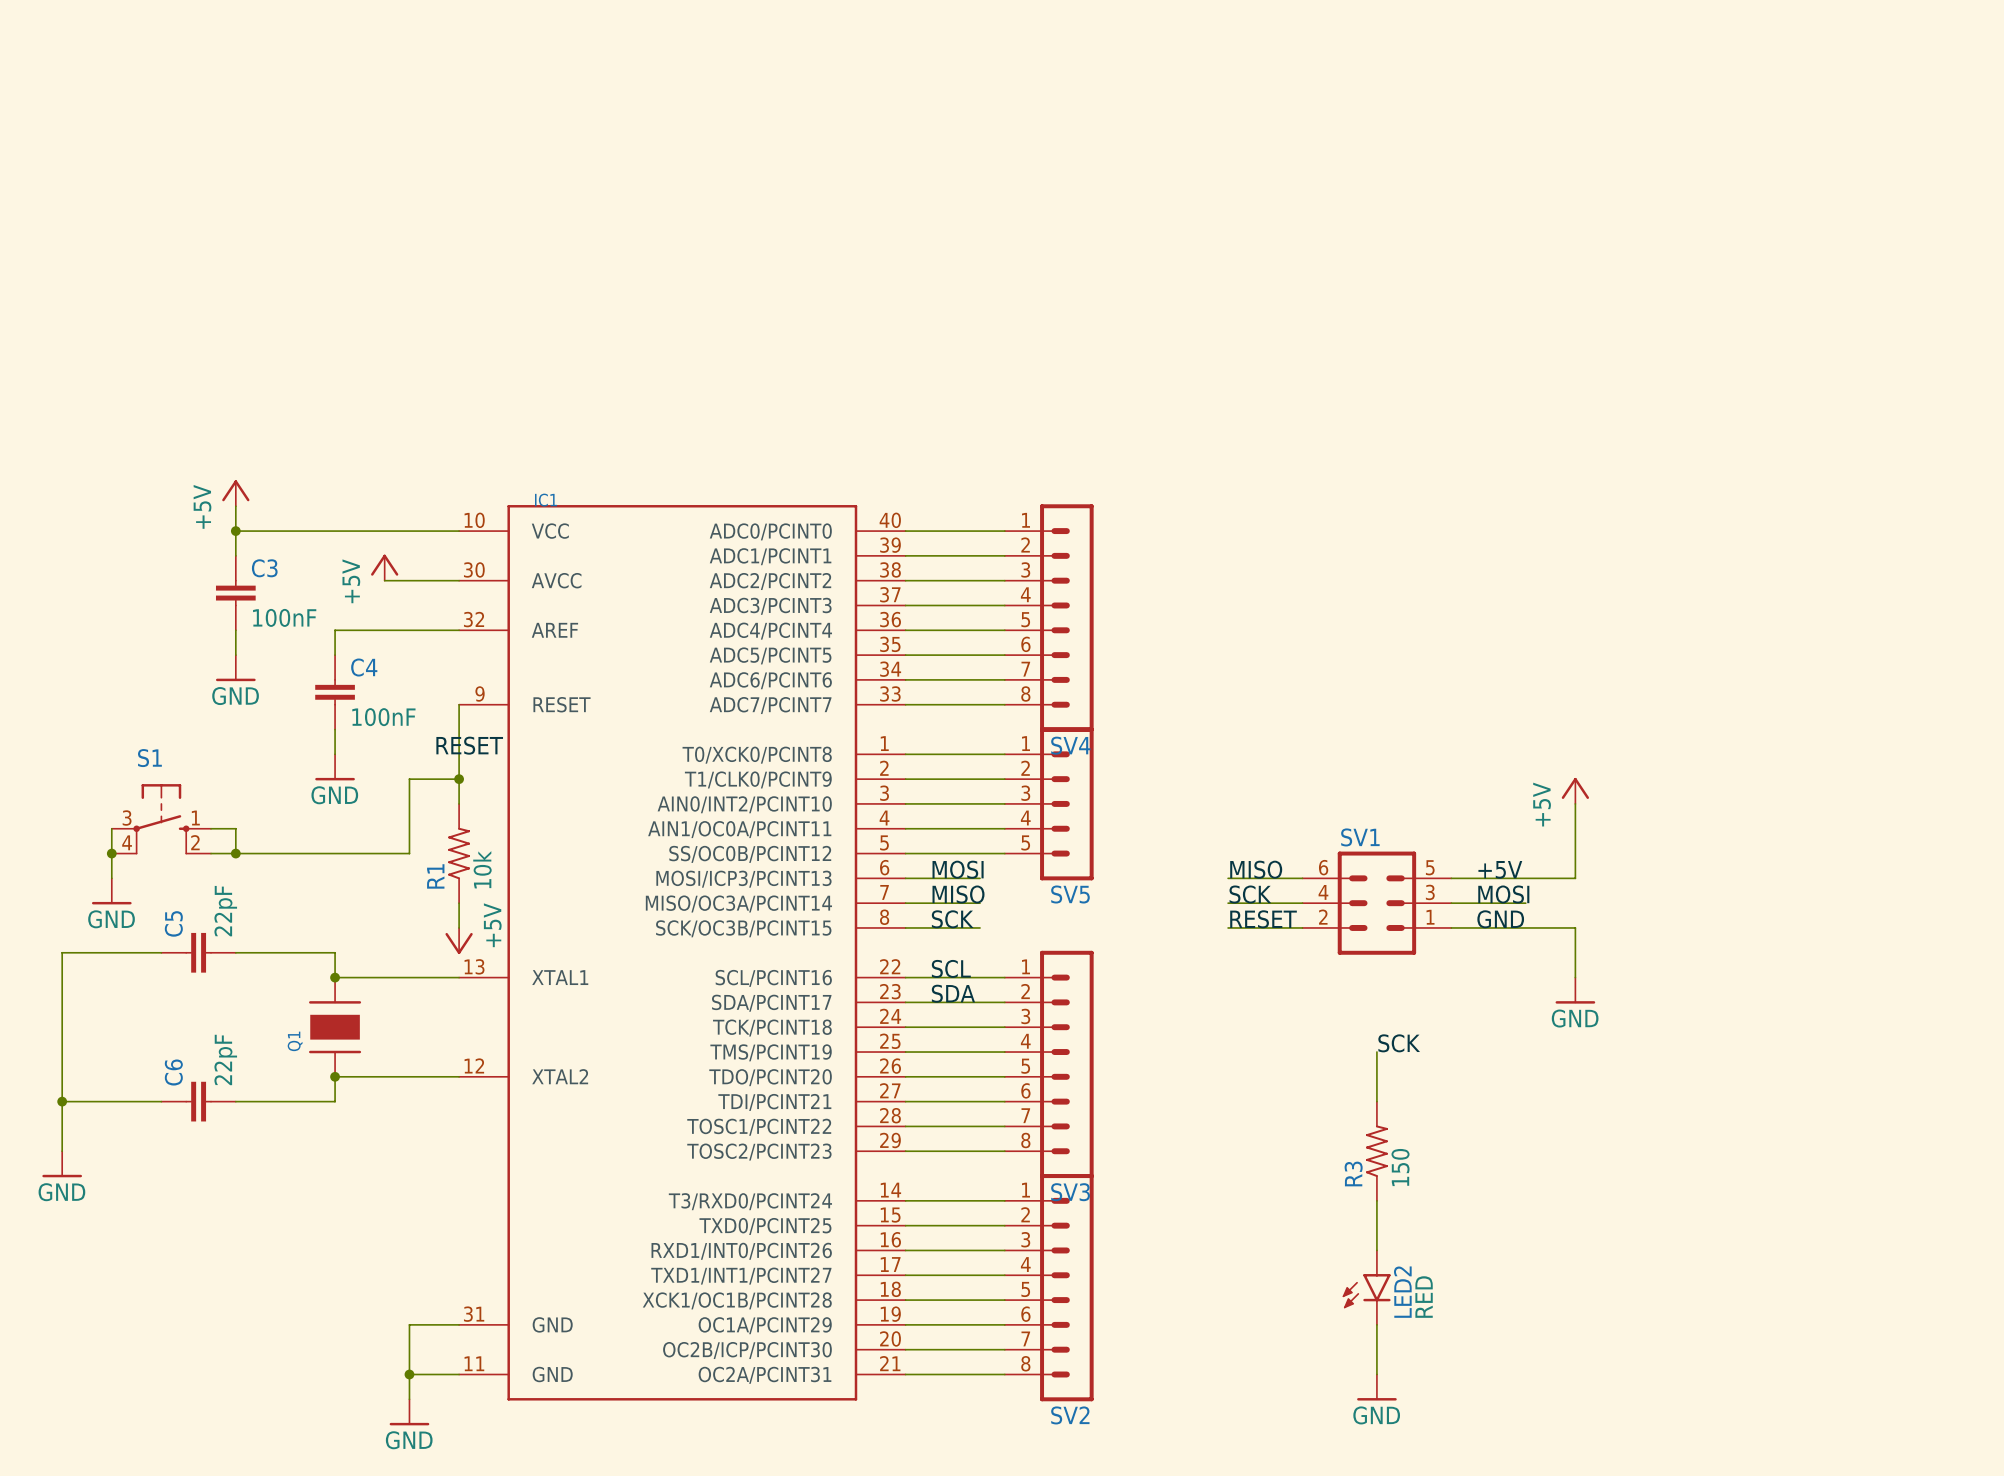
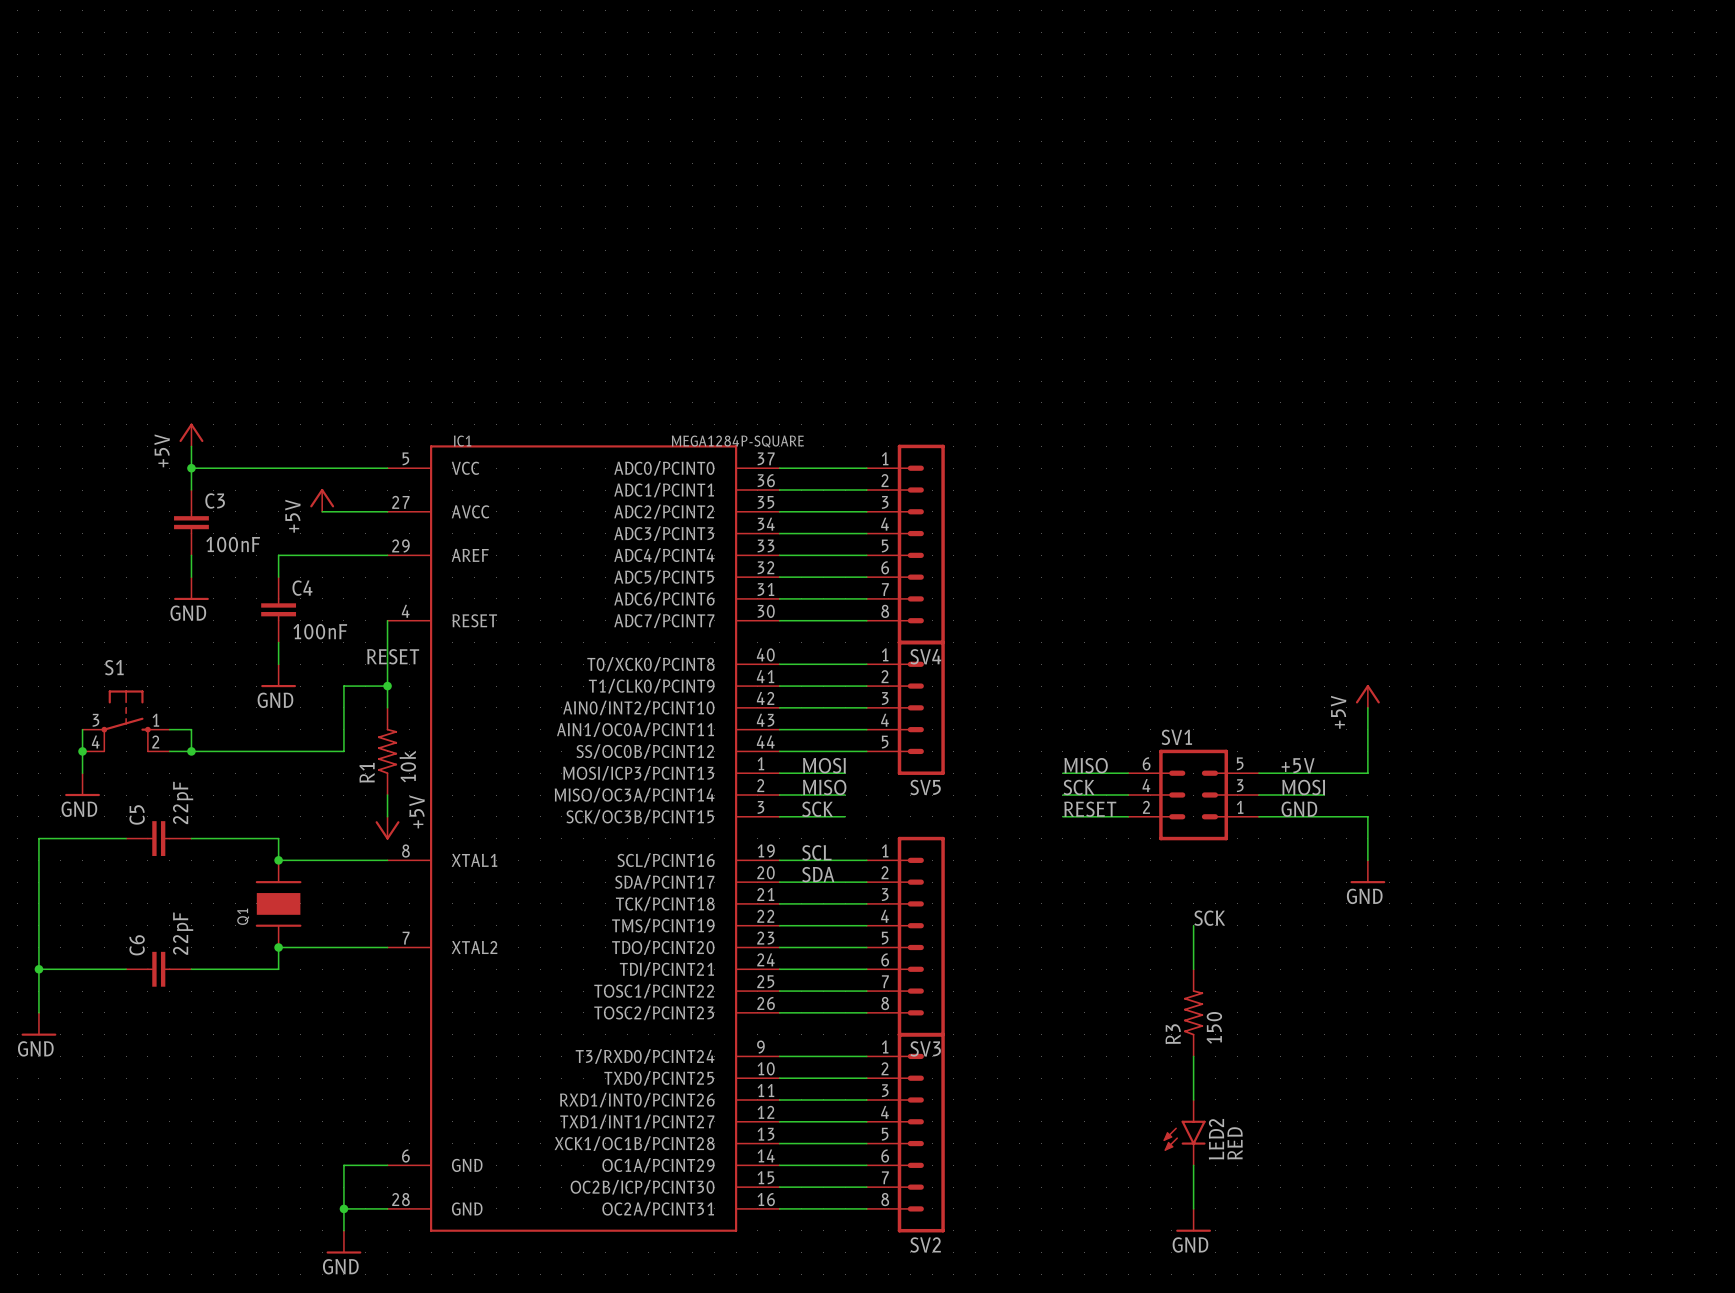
IC1 value: none -> MEGA1284P-SQUARE (737, 441)
IC1 symbol: [459, 505, 906, 1401] -> [387, 445, 780, 1232]

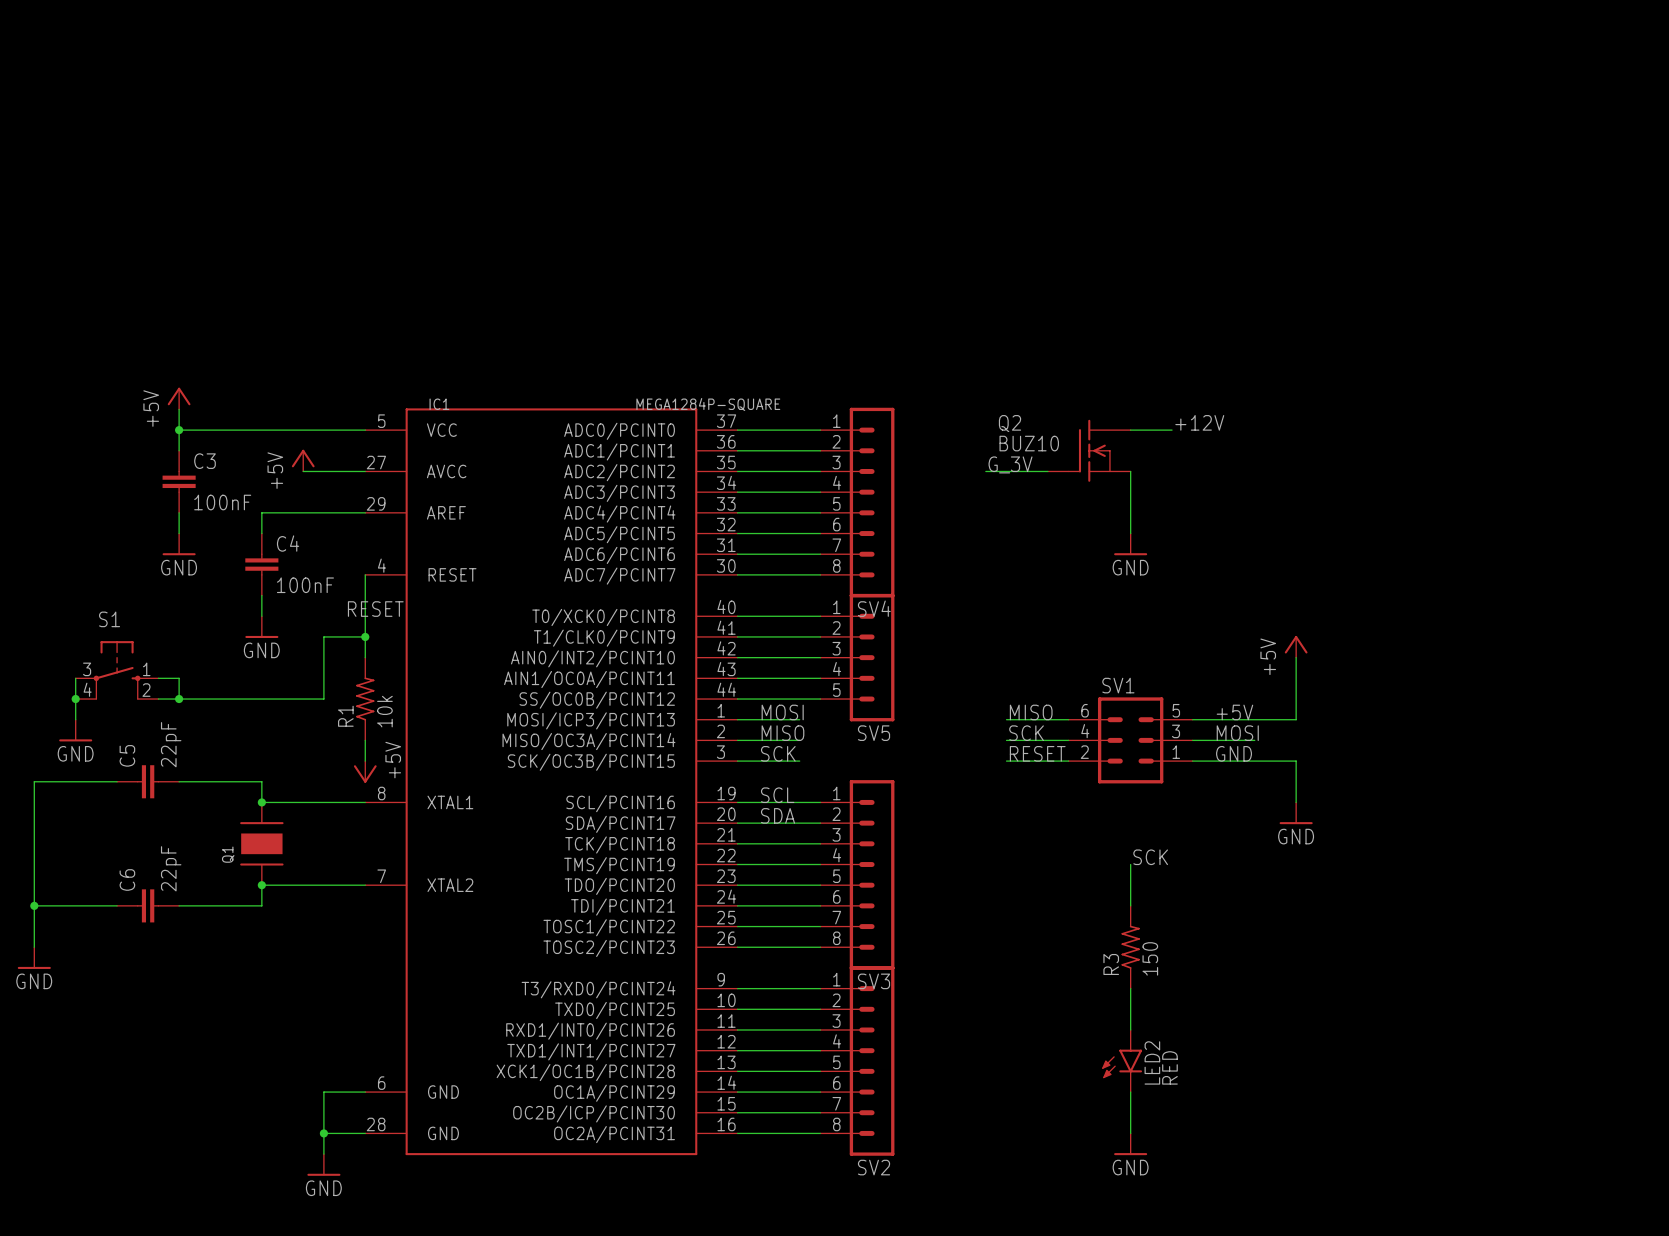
label: none -> +12V (1199, 422)
wire: none -> (1130, 430) (1172, 430)
Q2: none -> BUZ10 (1089, 450)
label: none -> G_3V (1010, 464)
wire: none -> (985, 471) (1047, 471)
wire: none -> (1130, 471) (1130, 533)
power symbol: none -> GND (1130, 544)

